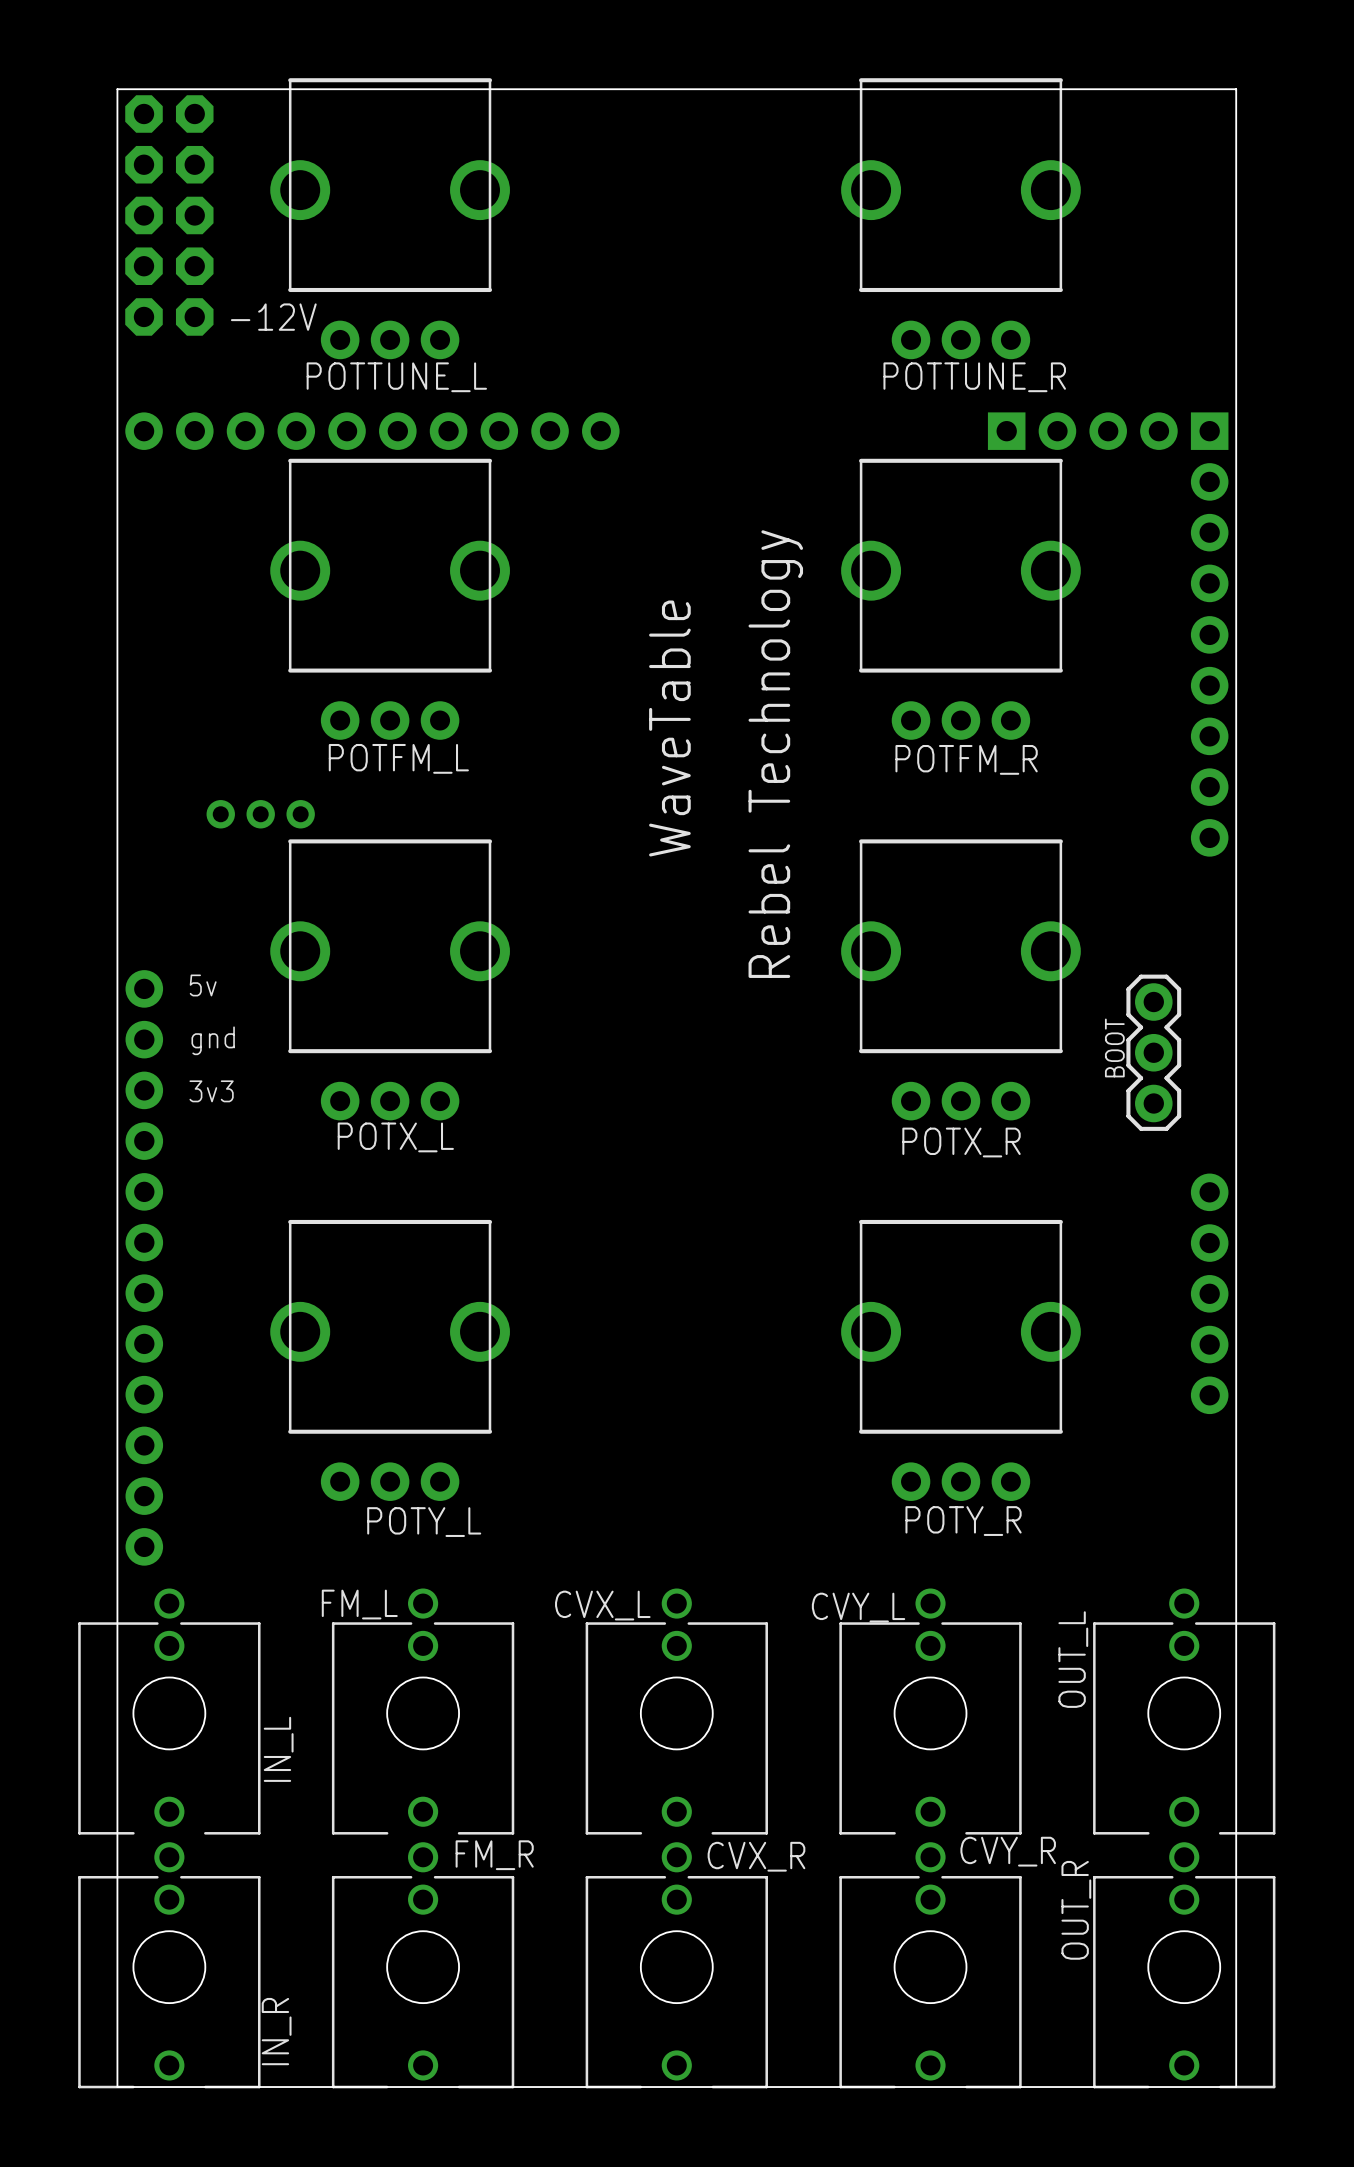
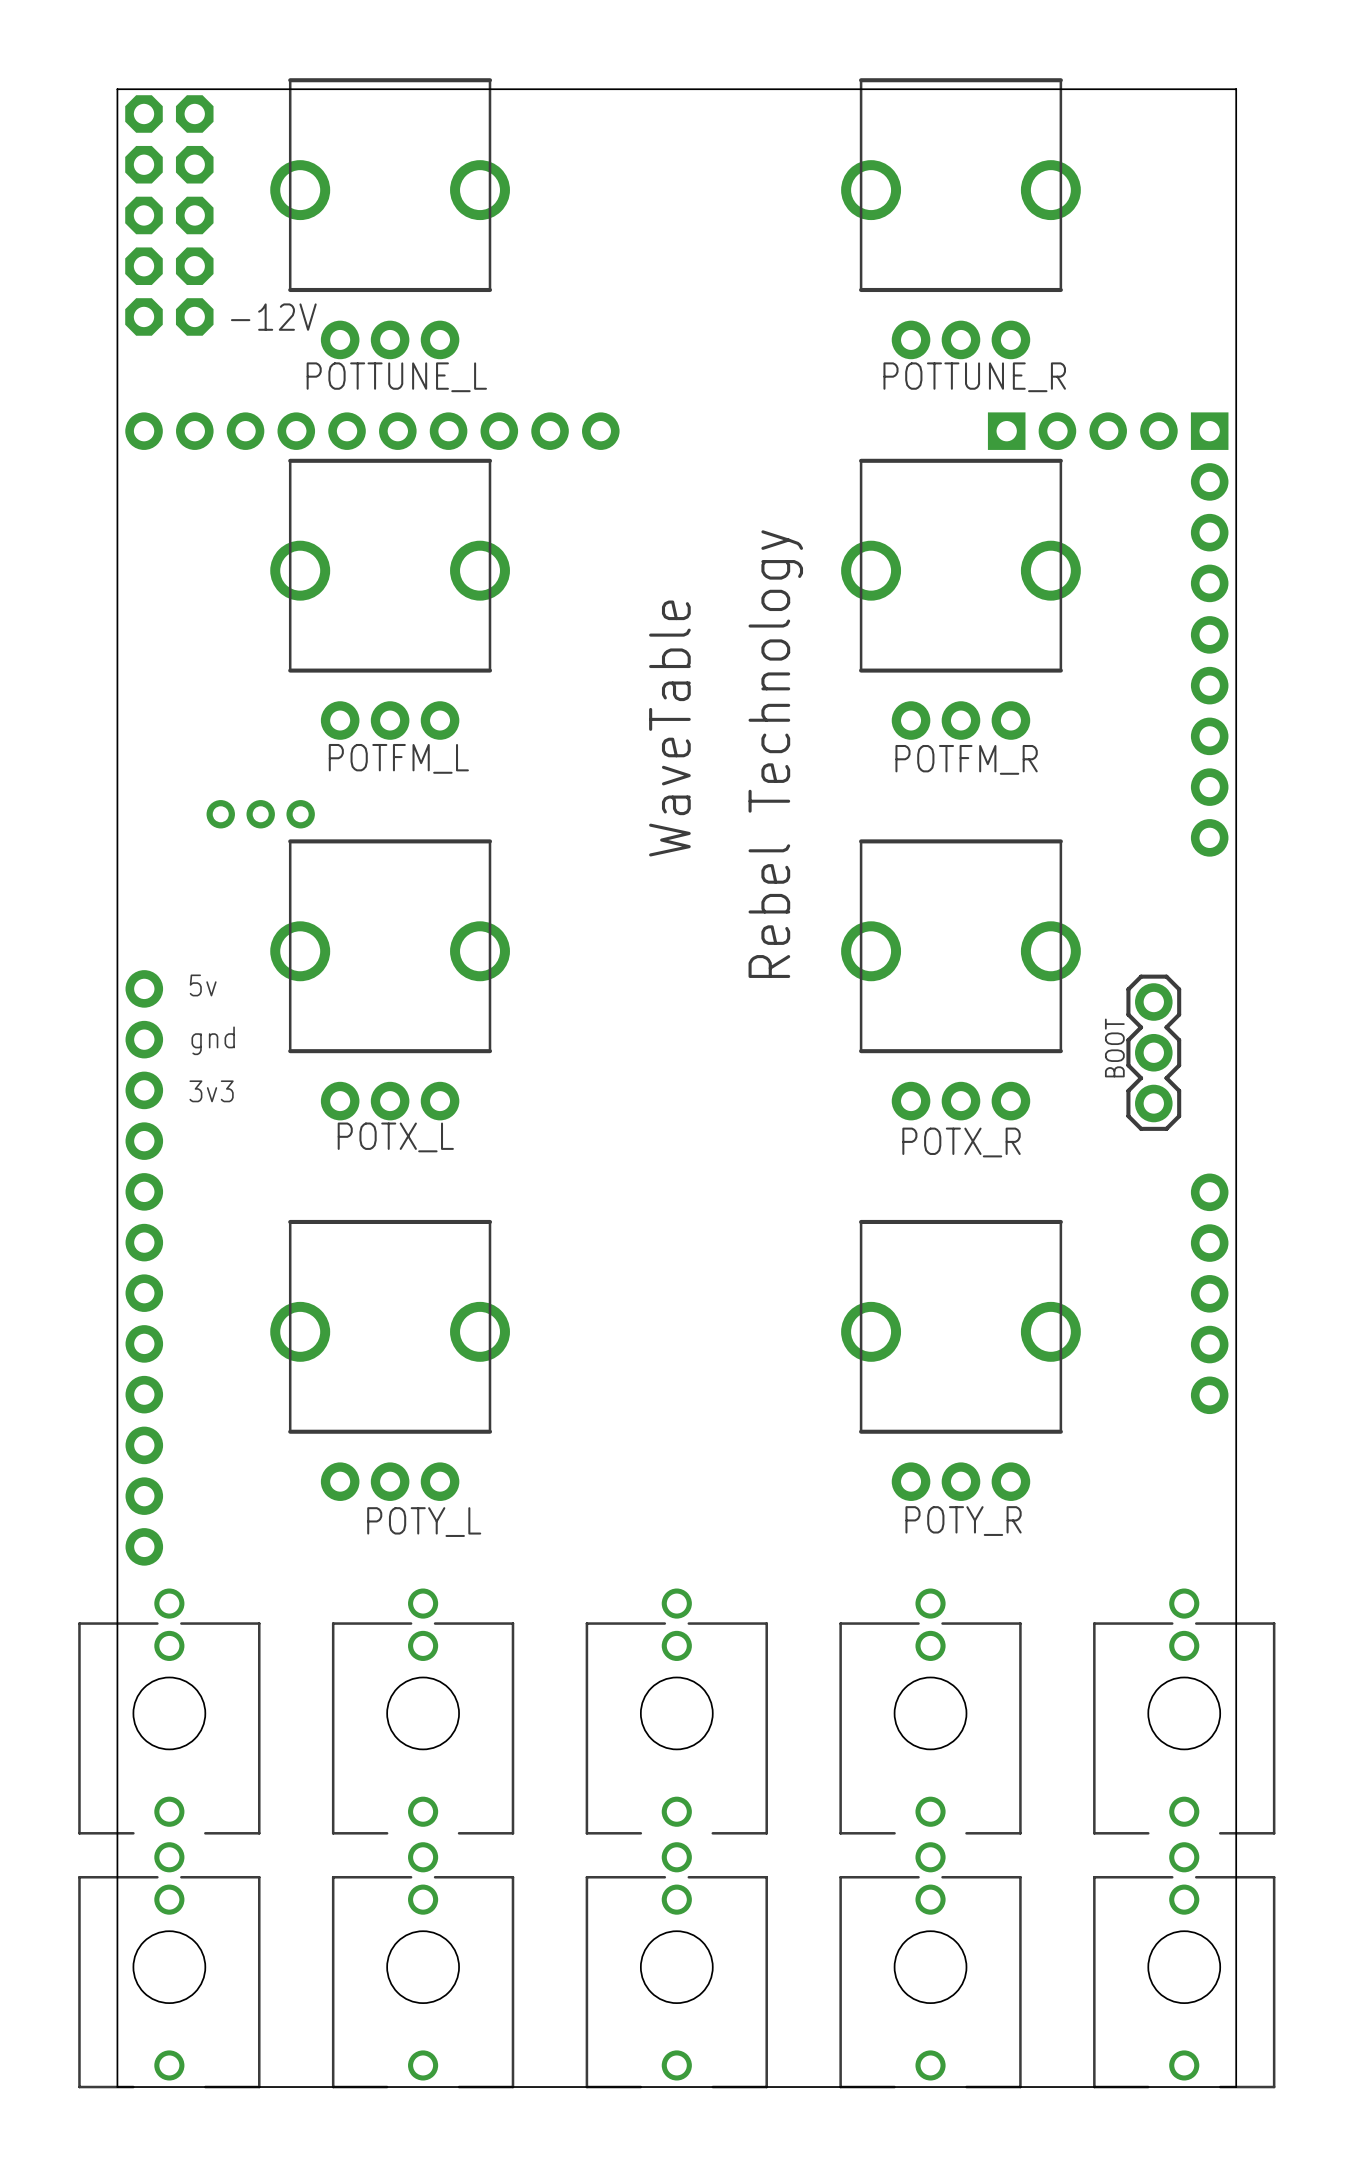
FM_L name: FM_L (359, 1604) -> none
CVX_L name: CVX_L (602, 1605) -> none
CVY_L name: CVY_L (858, 1607) -> none
OUT_L name: OUT_L (1073, 1659) -> none
IN_L name: IN_L (278, 1749) -> none
CVY_R name: CVY_R (1008, 1851) -> none
FM_R name: FM_R (494, 1855) -> none
CVX_R name: CVX_R (756, 1856) -> none
OUT_R name: OUT_R (1076, 1910) -> none
IN_R name: IN_R (276, 2031) -> none

